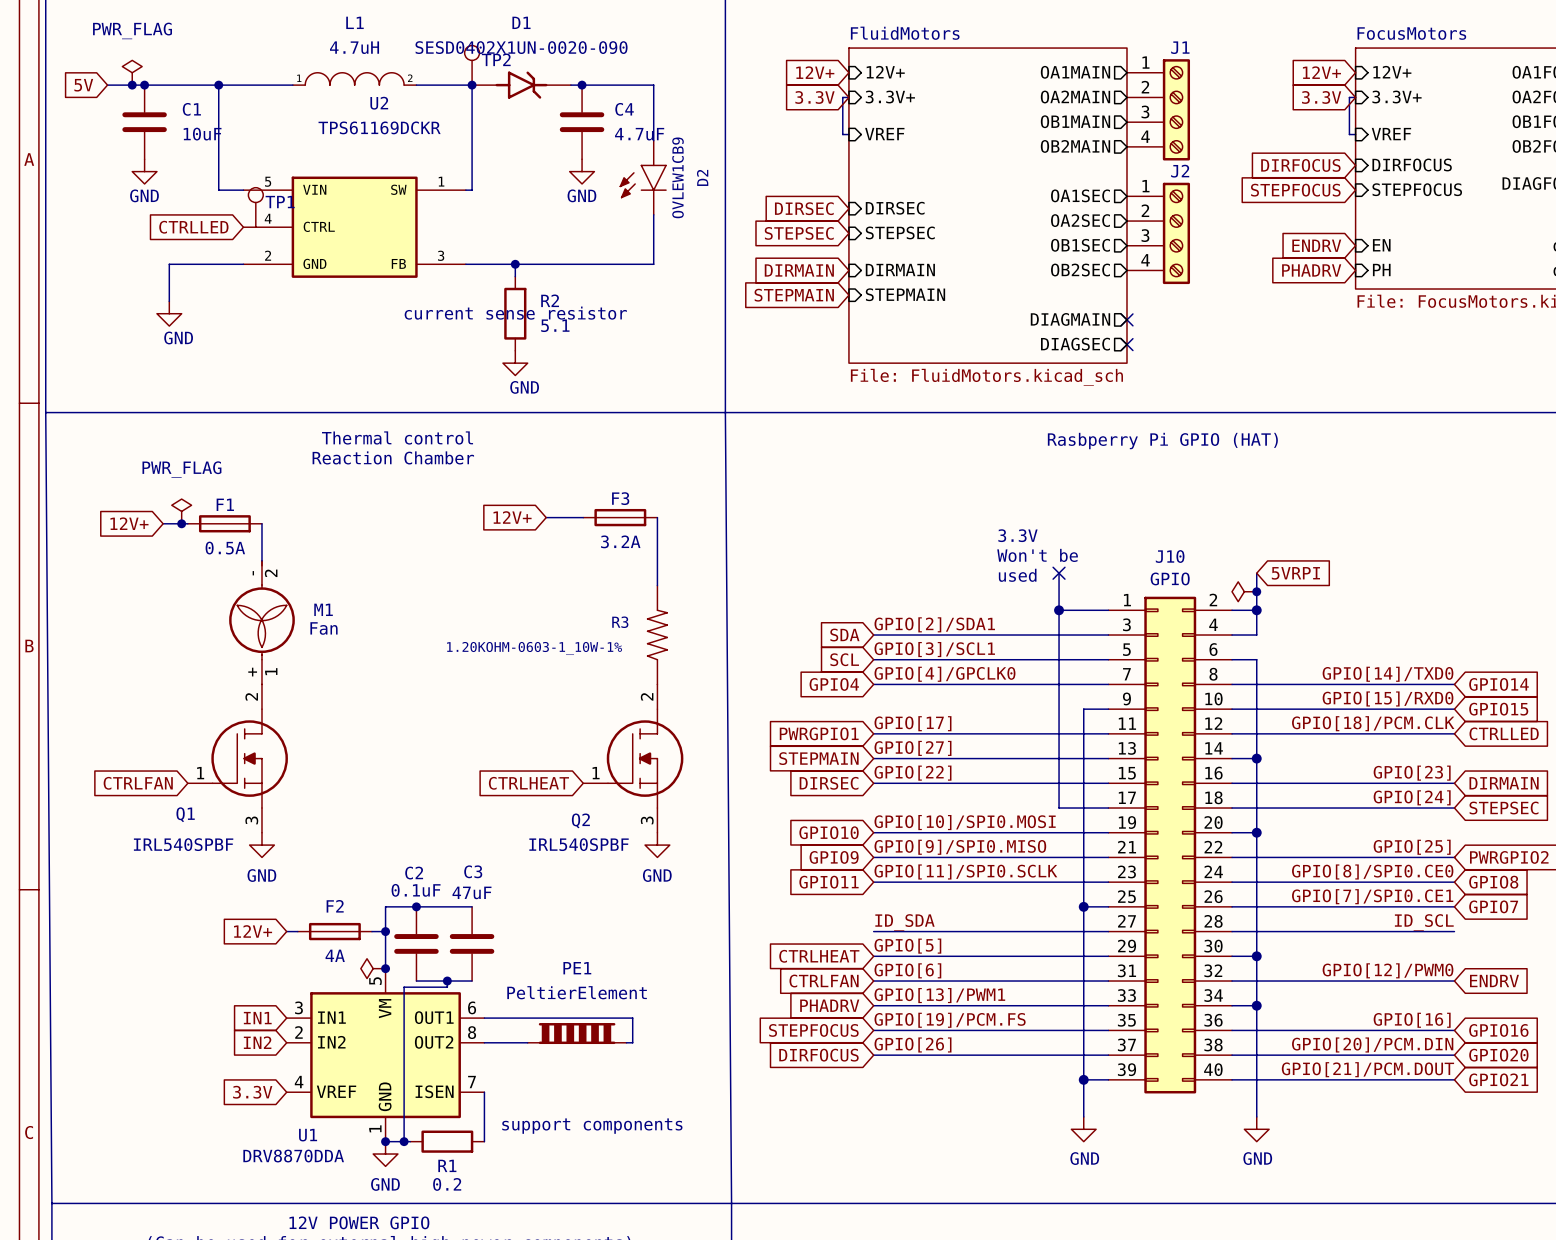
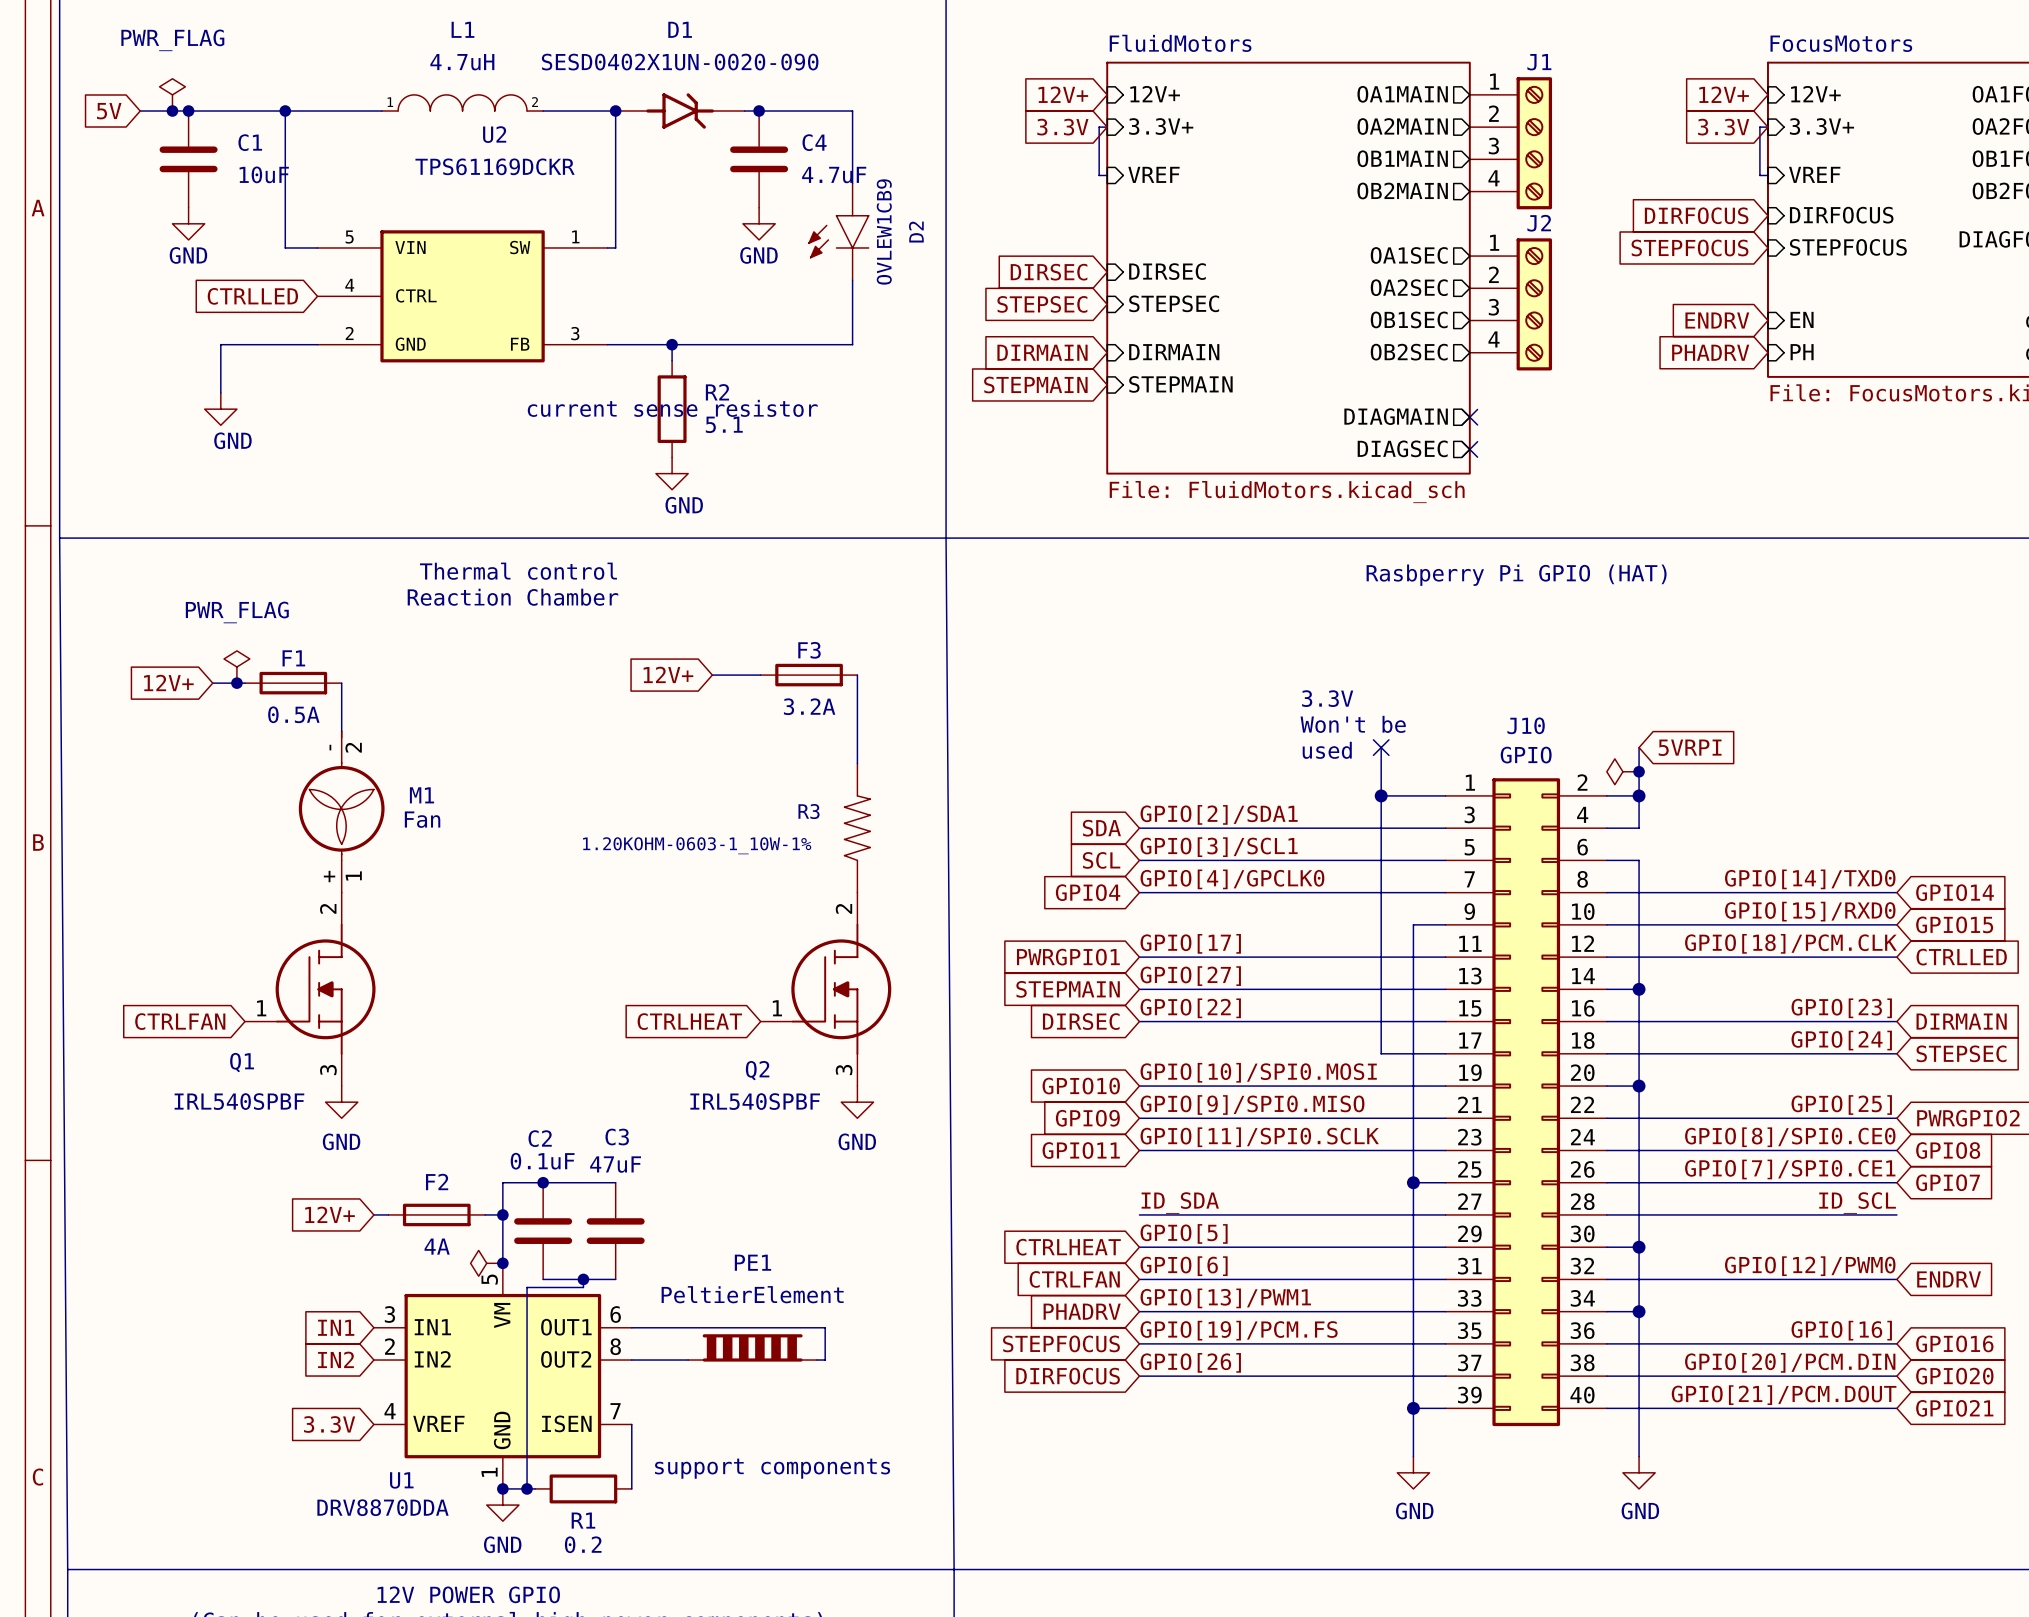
TP2: (472, 65) -> none
TP1: (255, 207) -> none

